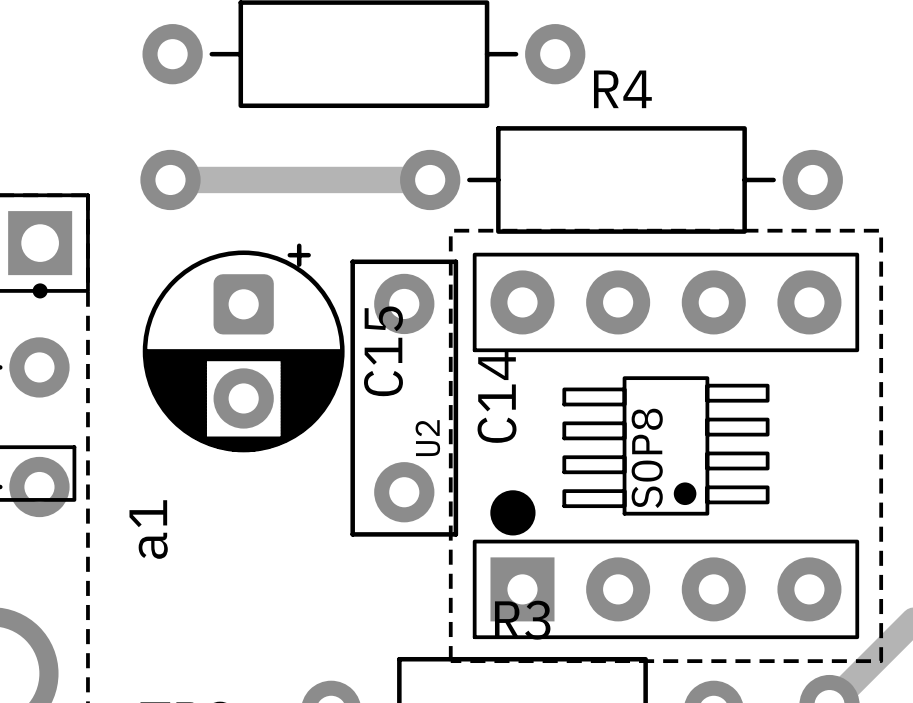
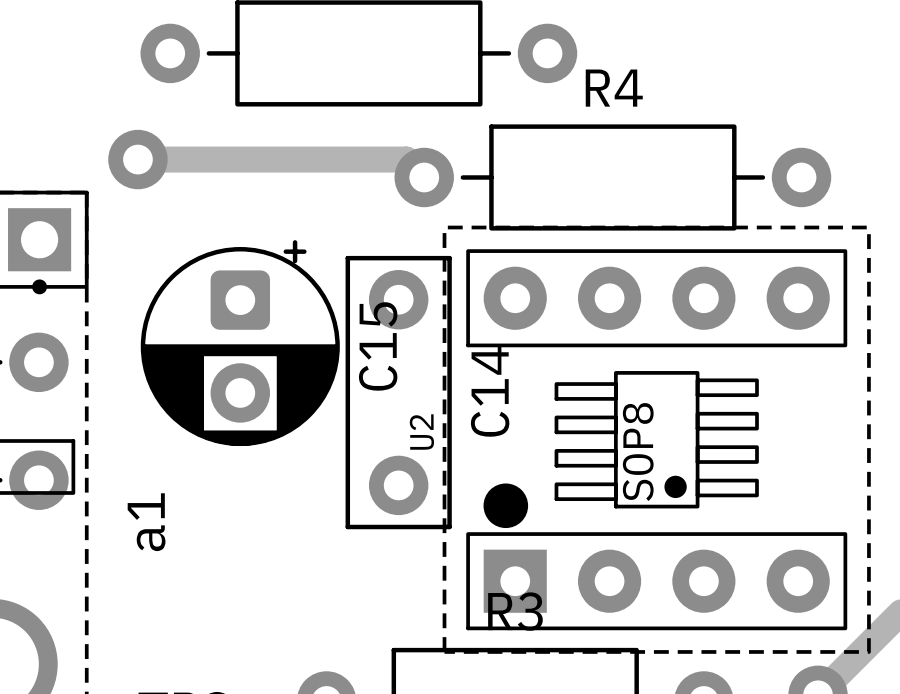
track: (170, 179) (430, 179) -> (137, 159) (406, 159) (424, 177)
via position: (170, 179) -> (137, 159)

